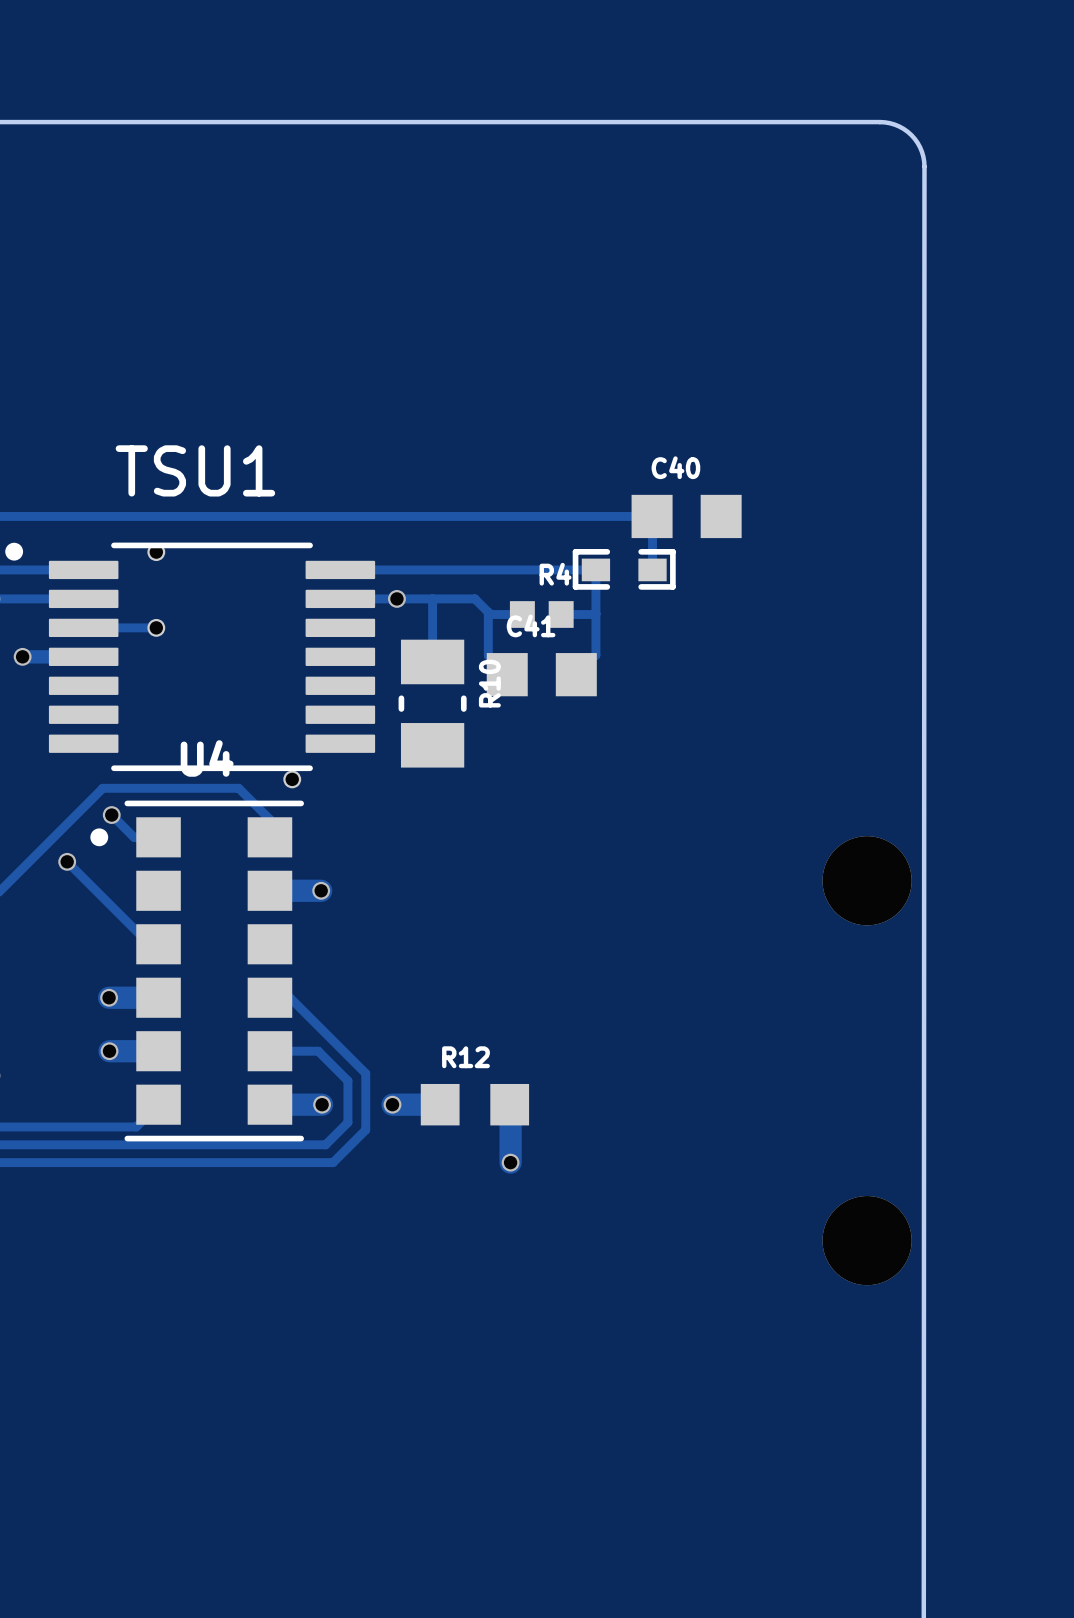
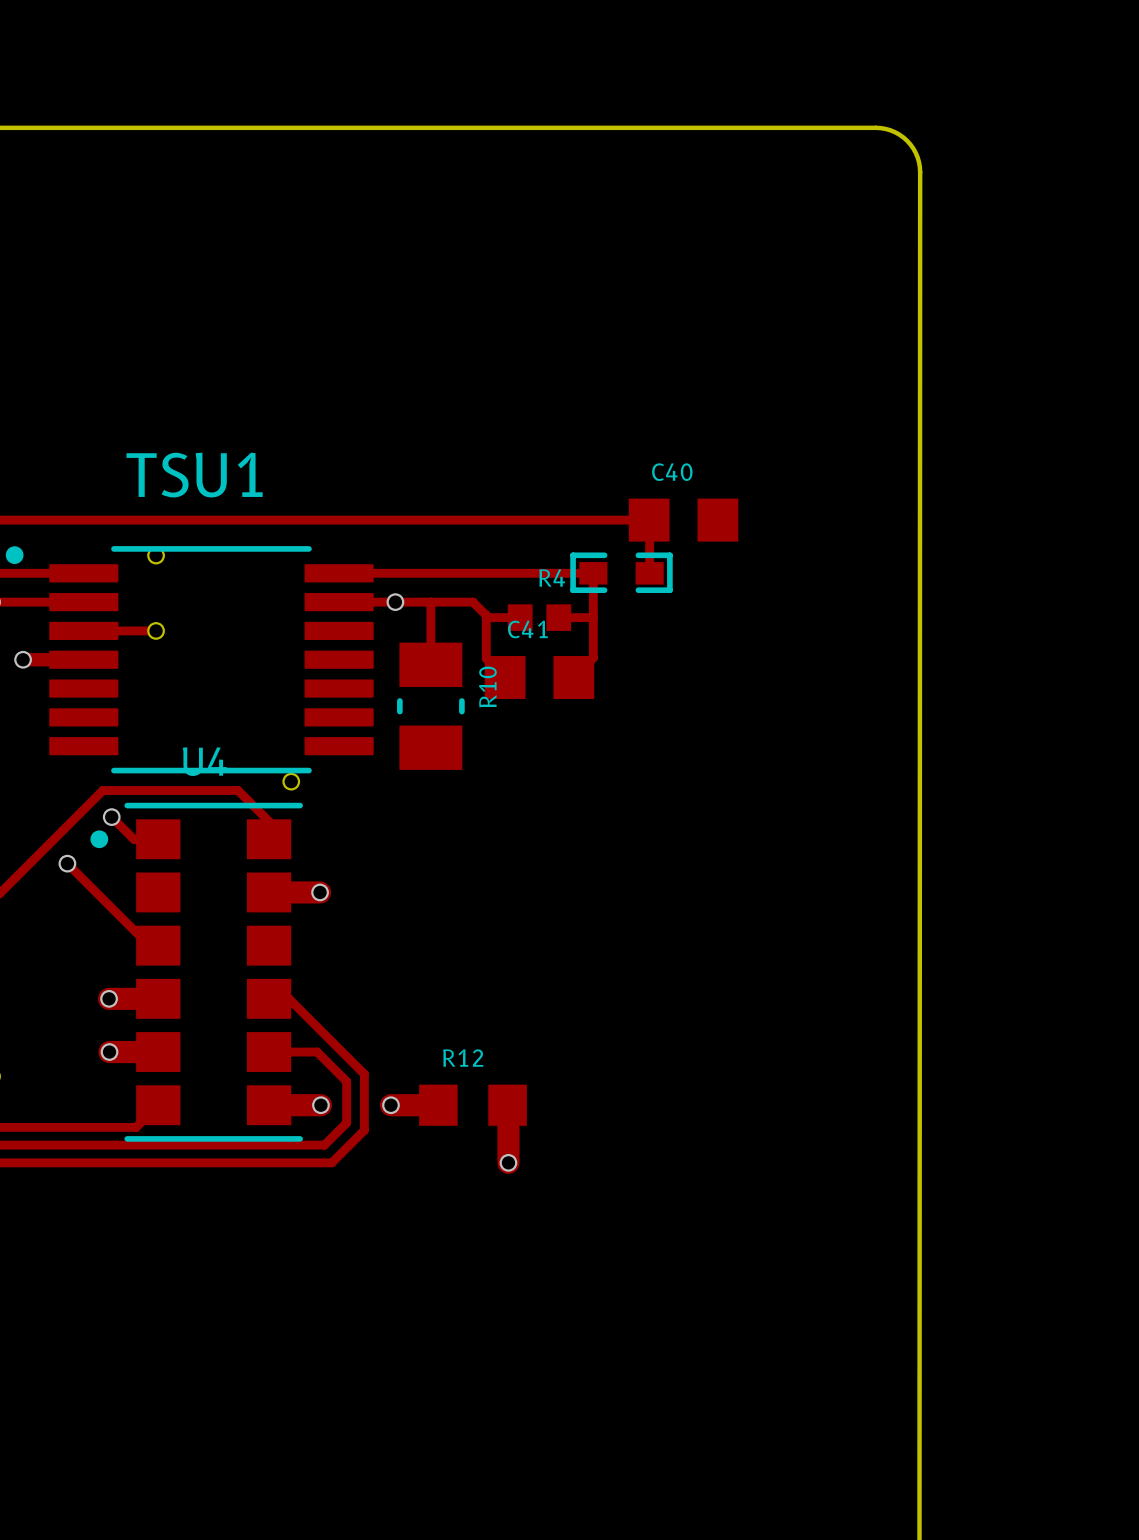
part: (867, 880) -> none
part: (867, 1240) -> none

